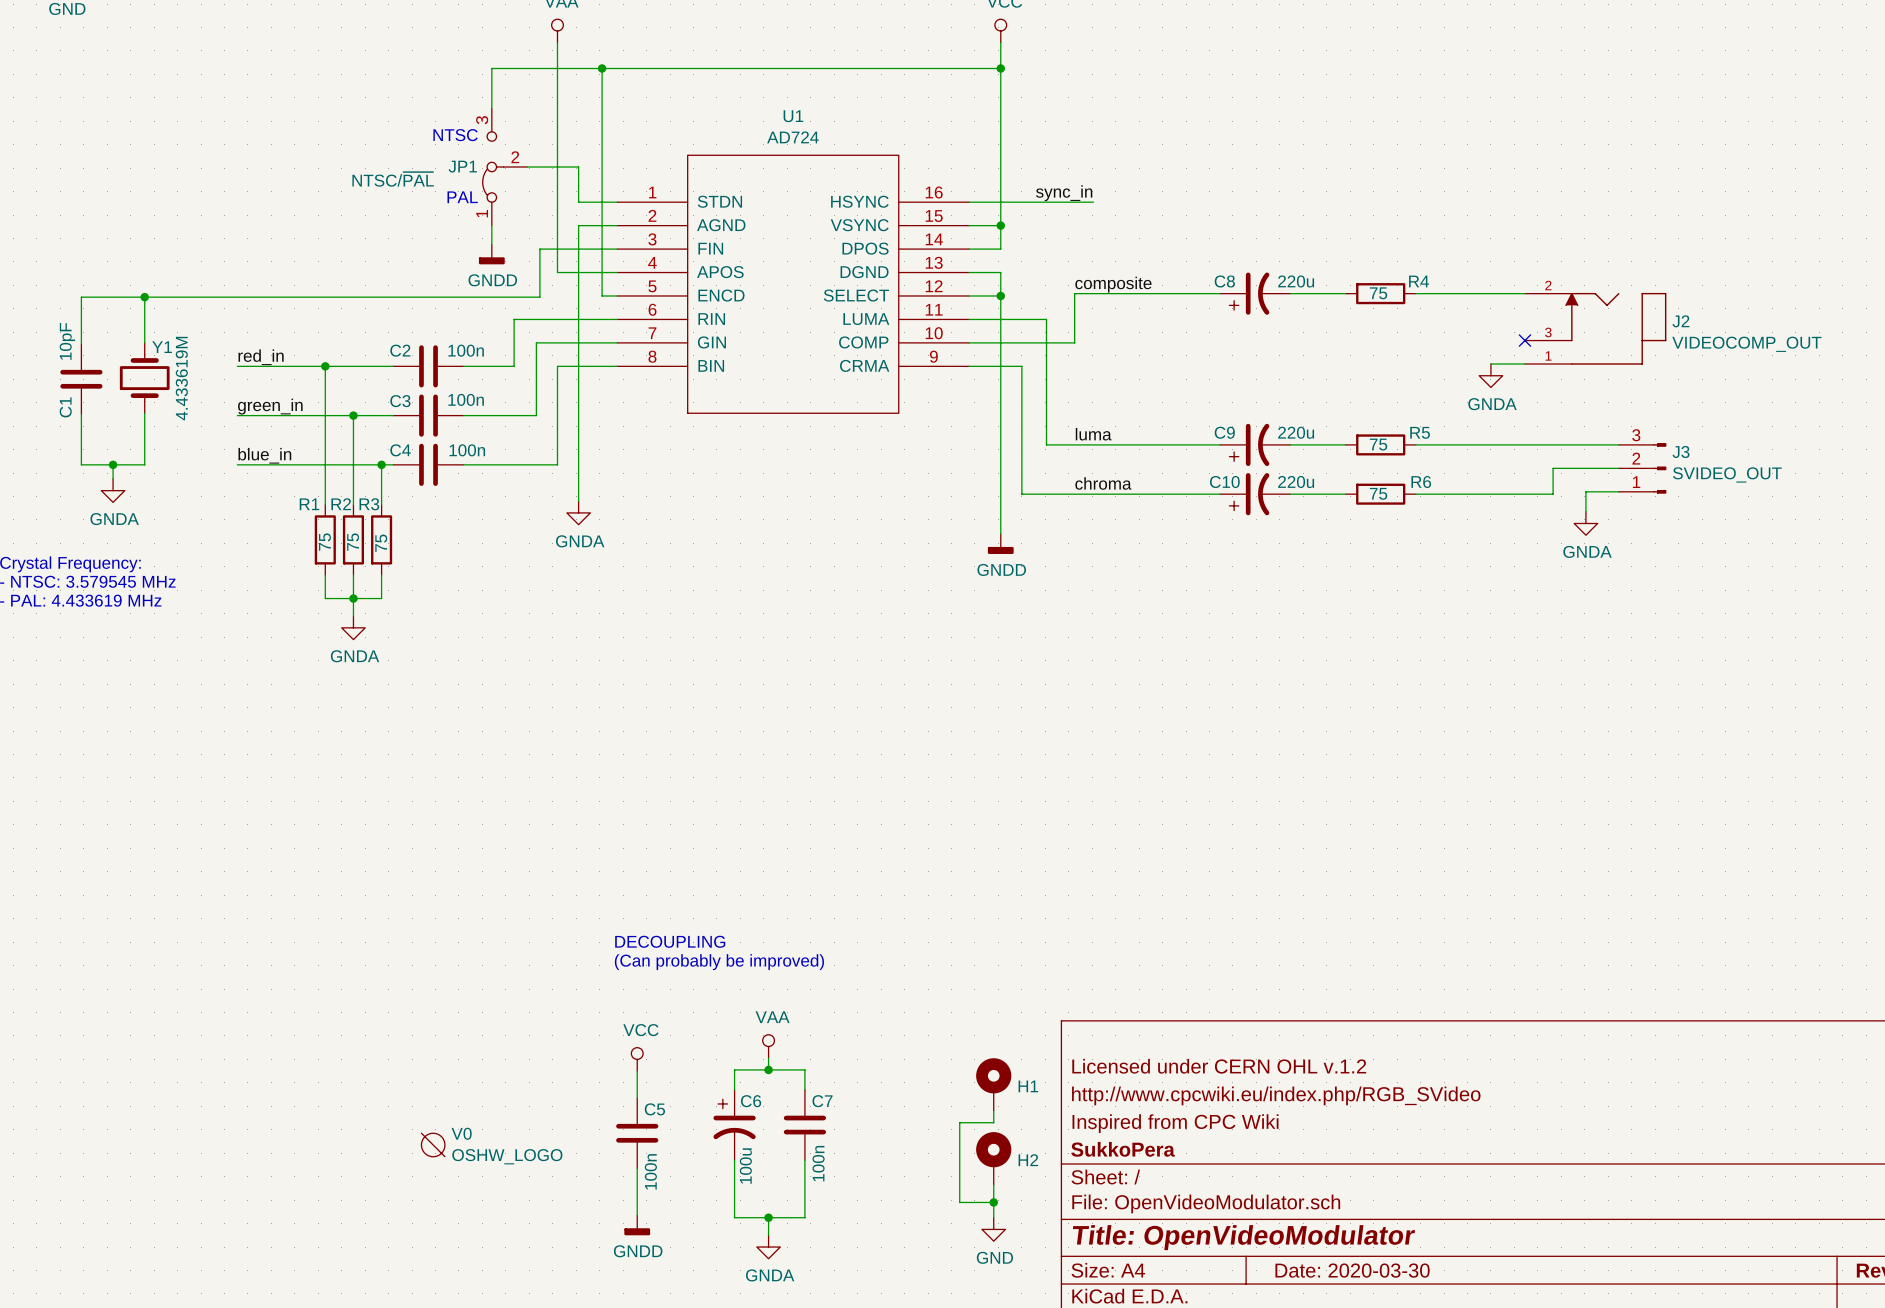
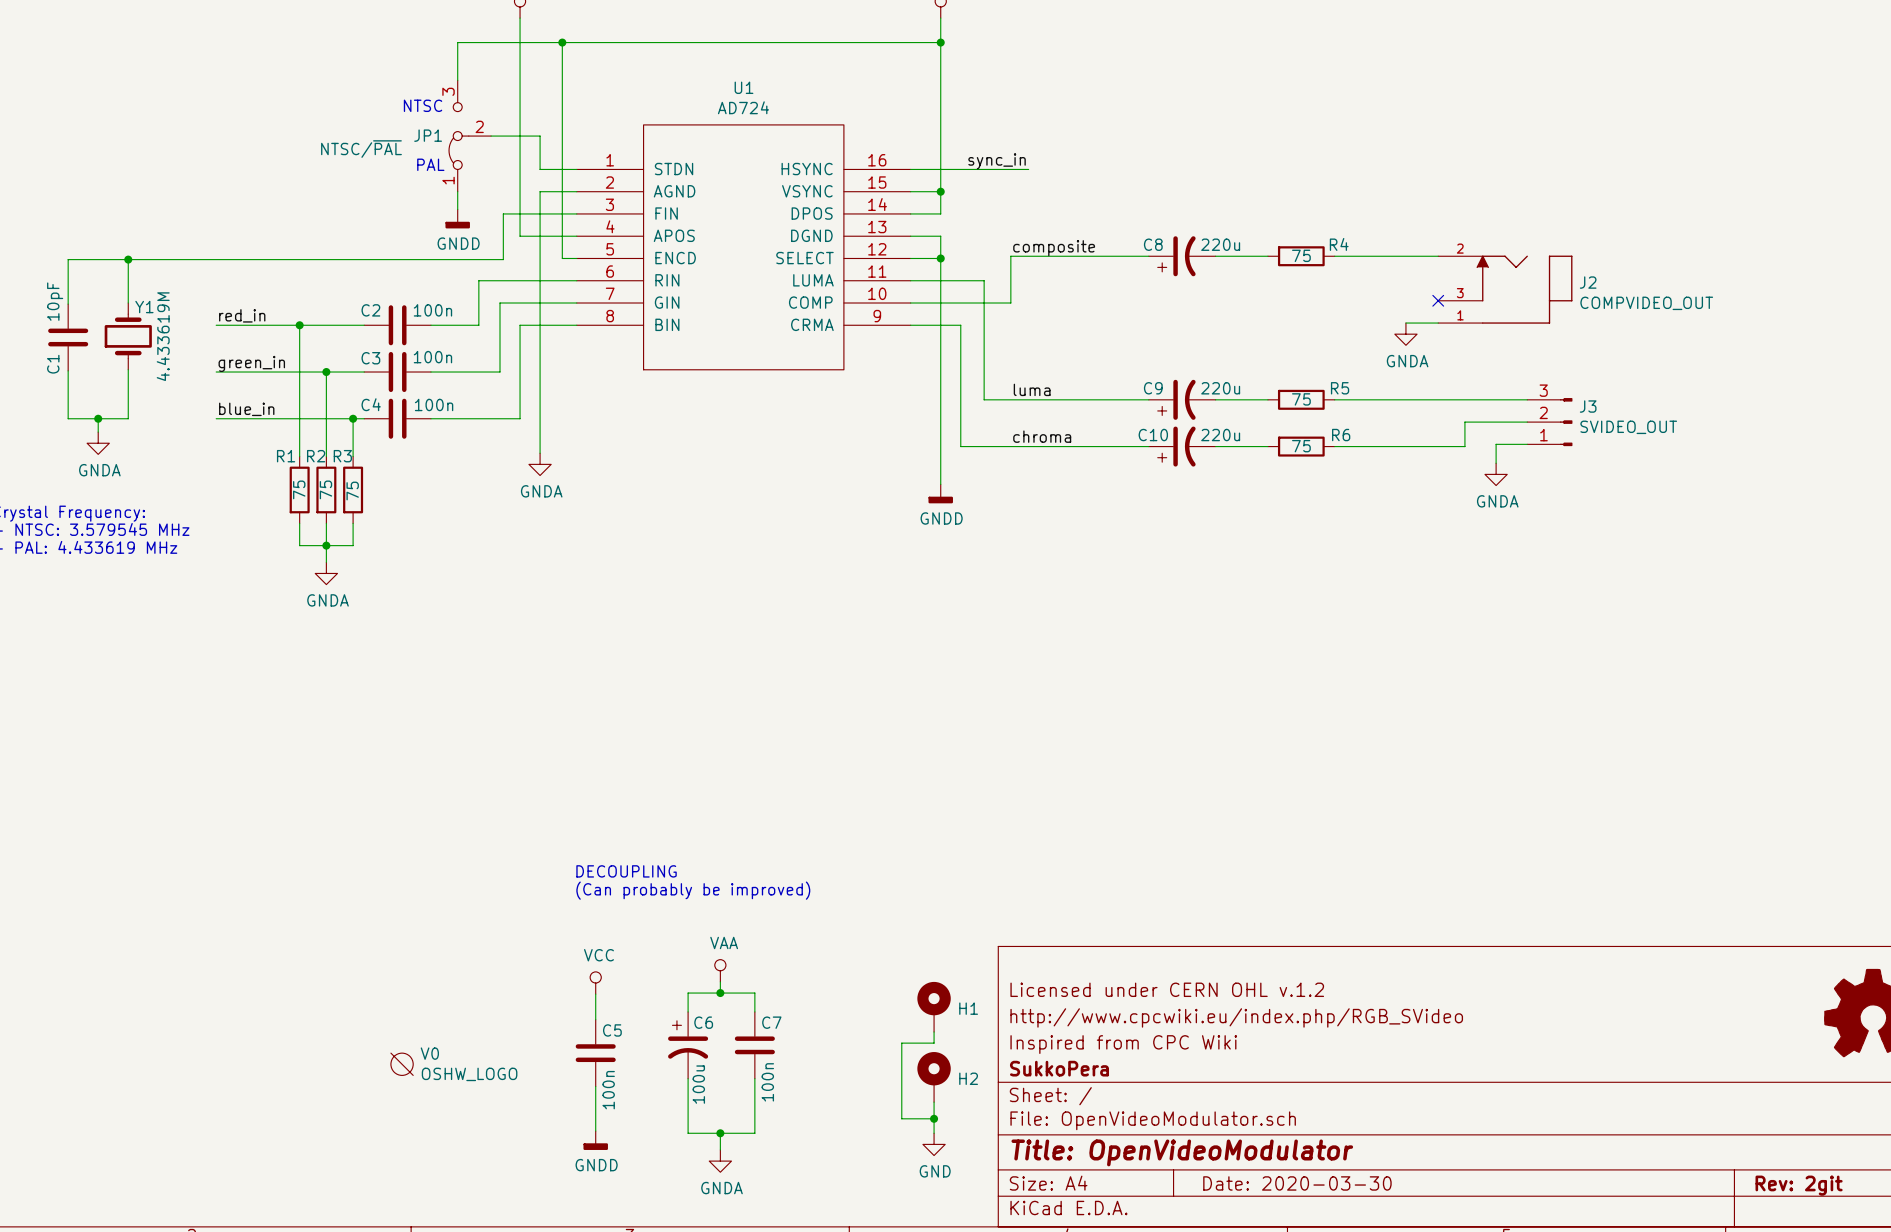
J2 value: VIDEOCOMP_OUT (1746, 344) -> COMPVIDEO_OUT (1646, 303)

